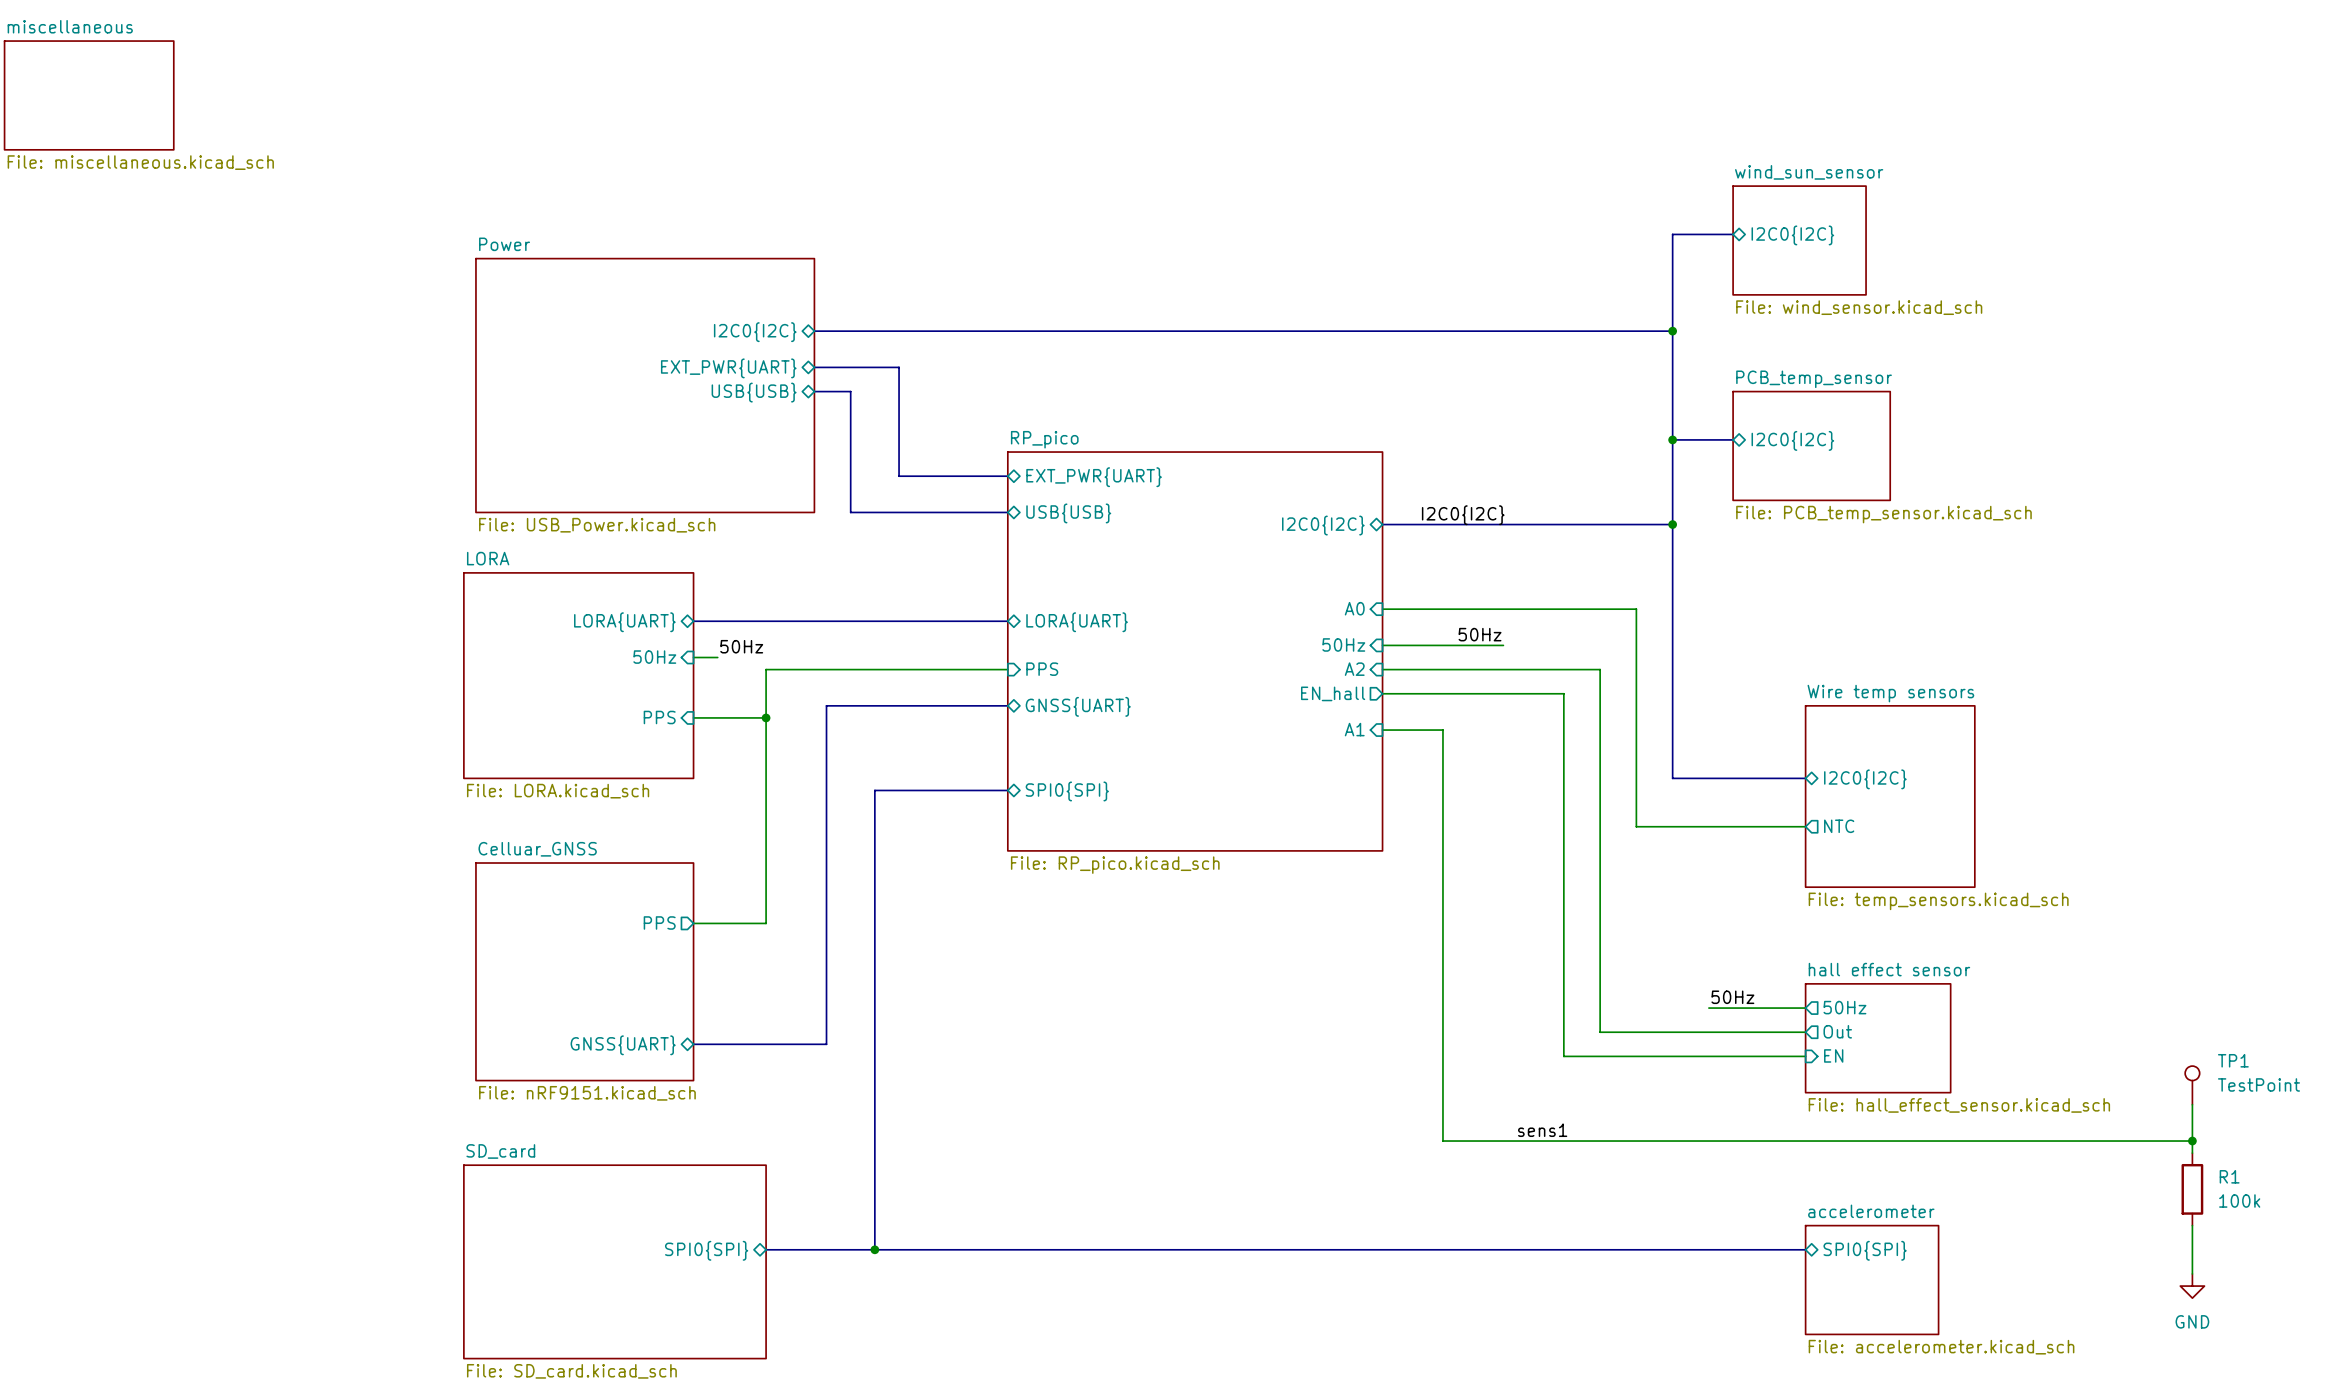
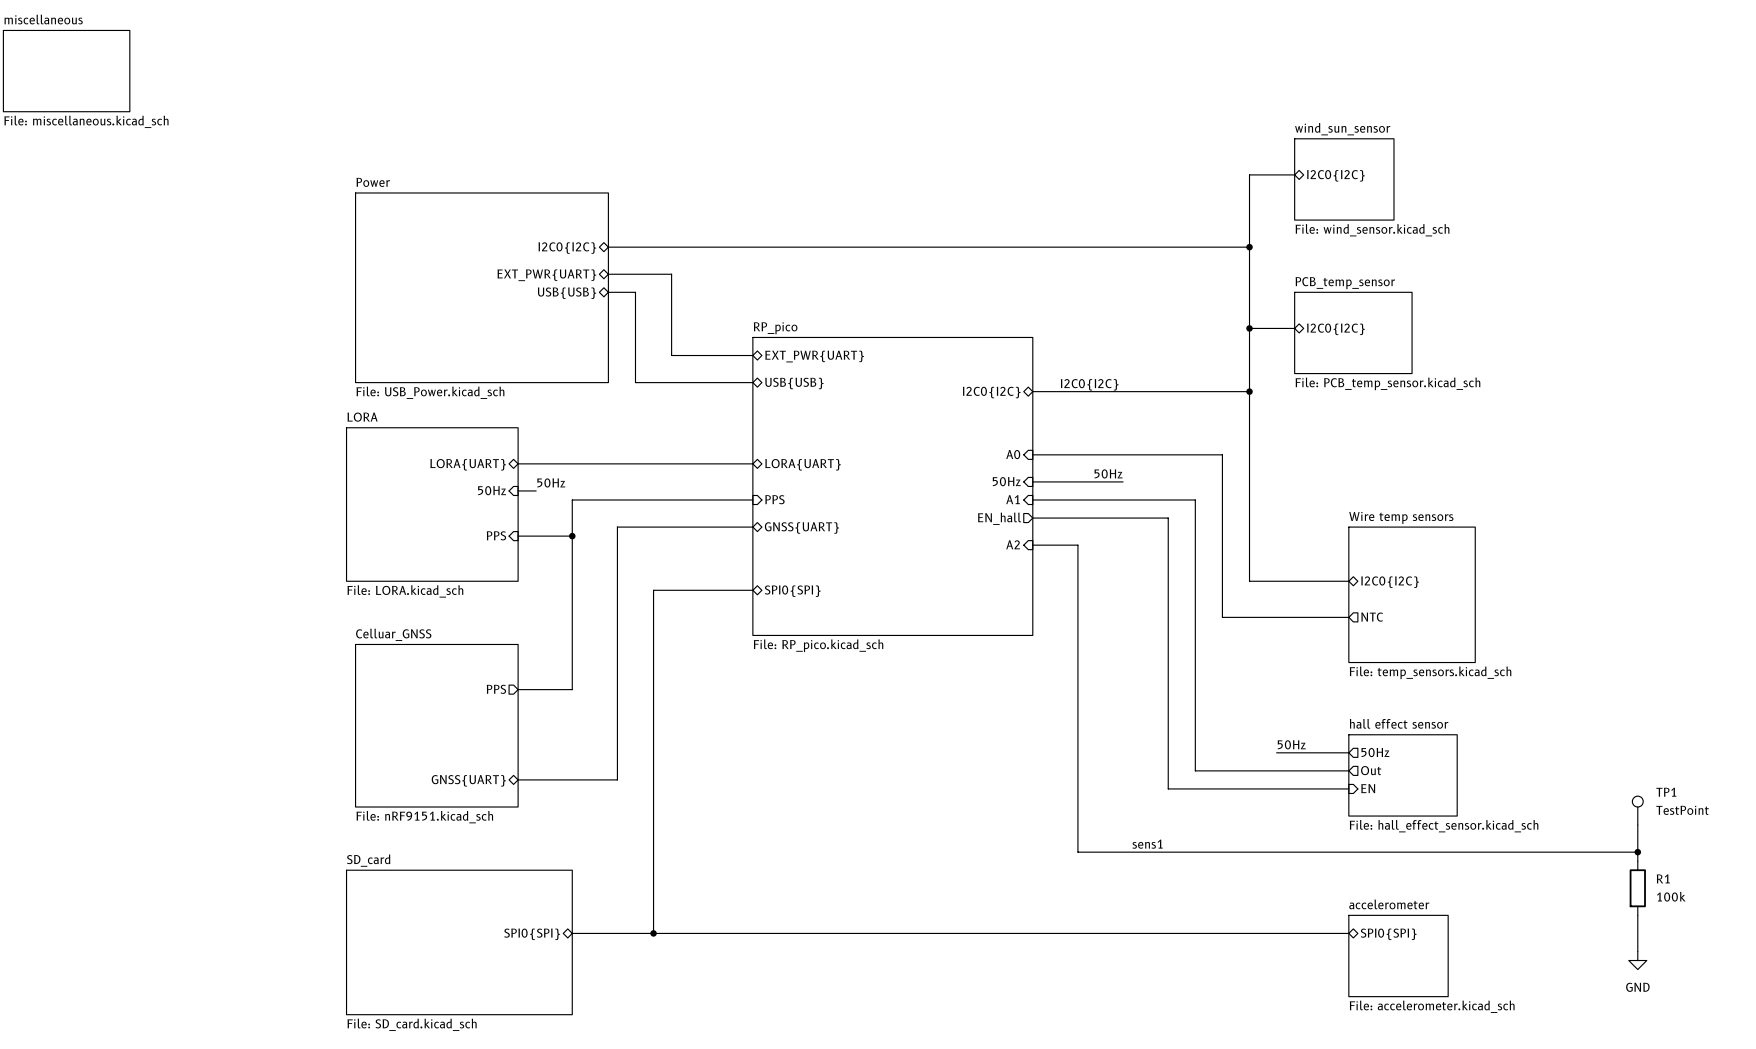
sheet pin: A2 (1354, 669) -> A1 (1013, 499)
sheet pin: A1 (1354, 729) -> A2 (1013, 544)

